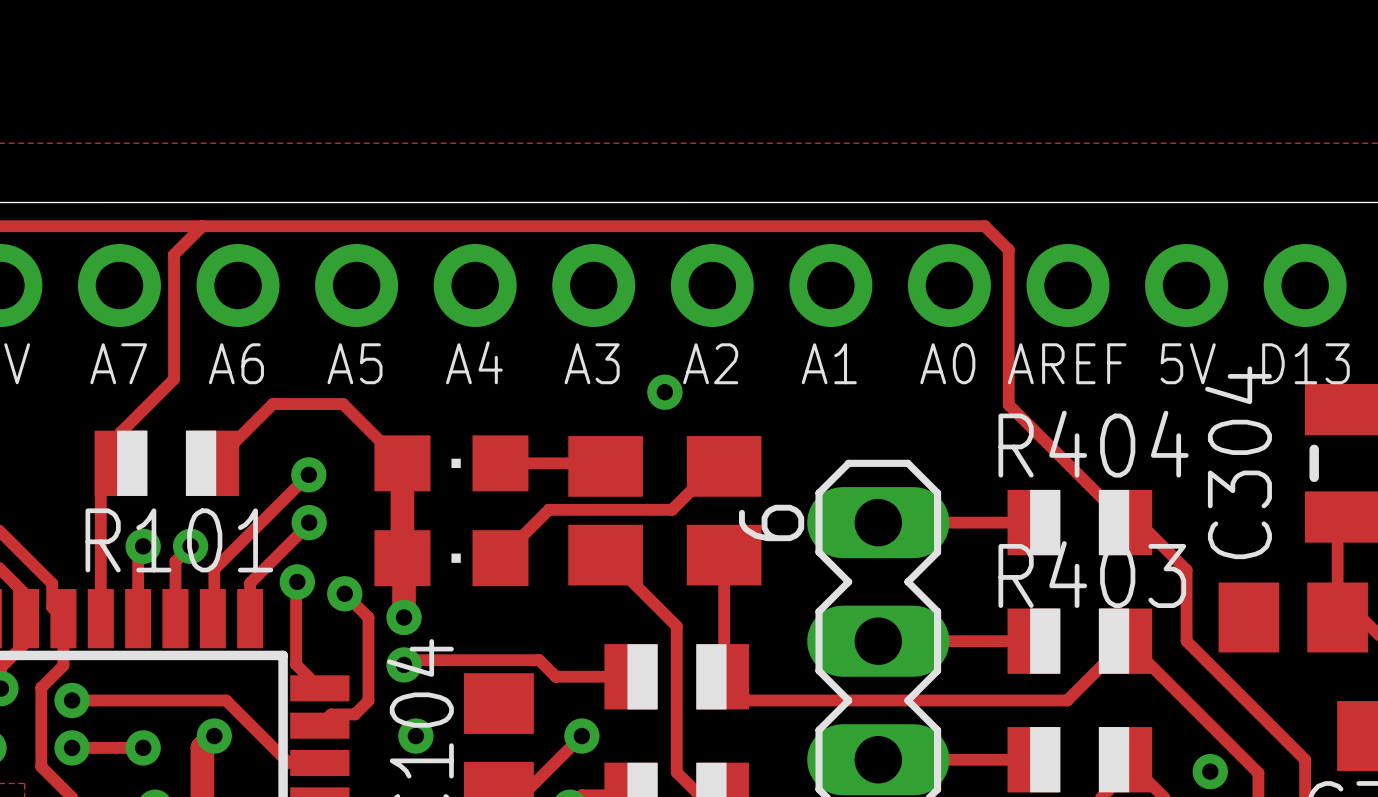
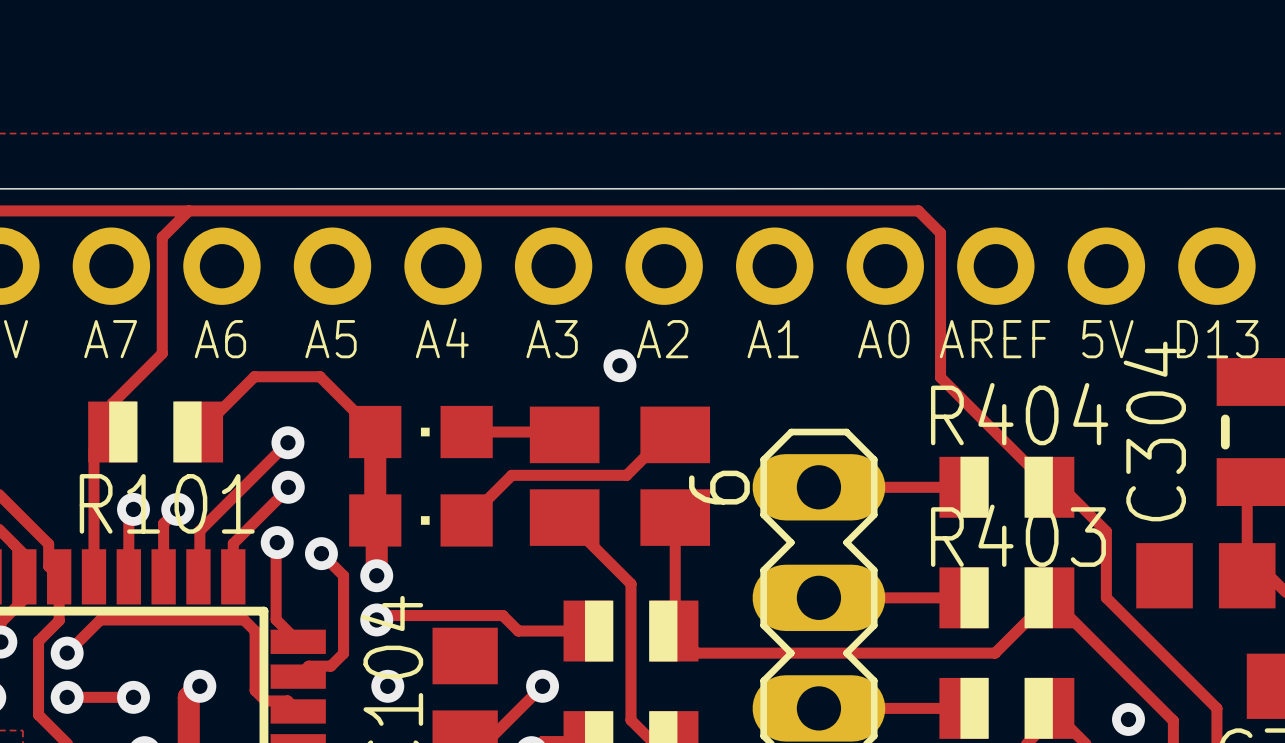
track: (72, 700) (226, 700) (288, 763) (319, 763) -> (67, 653) (100, 619) (244, 619) (255, 631) (255, 690) (265, 700) (287, 700) (298, 711)

